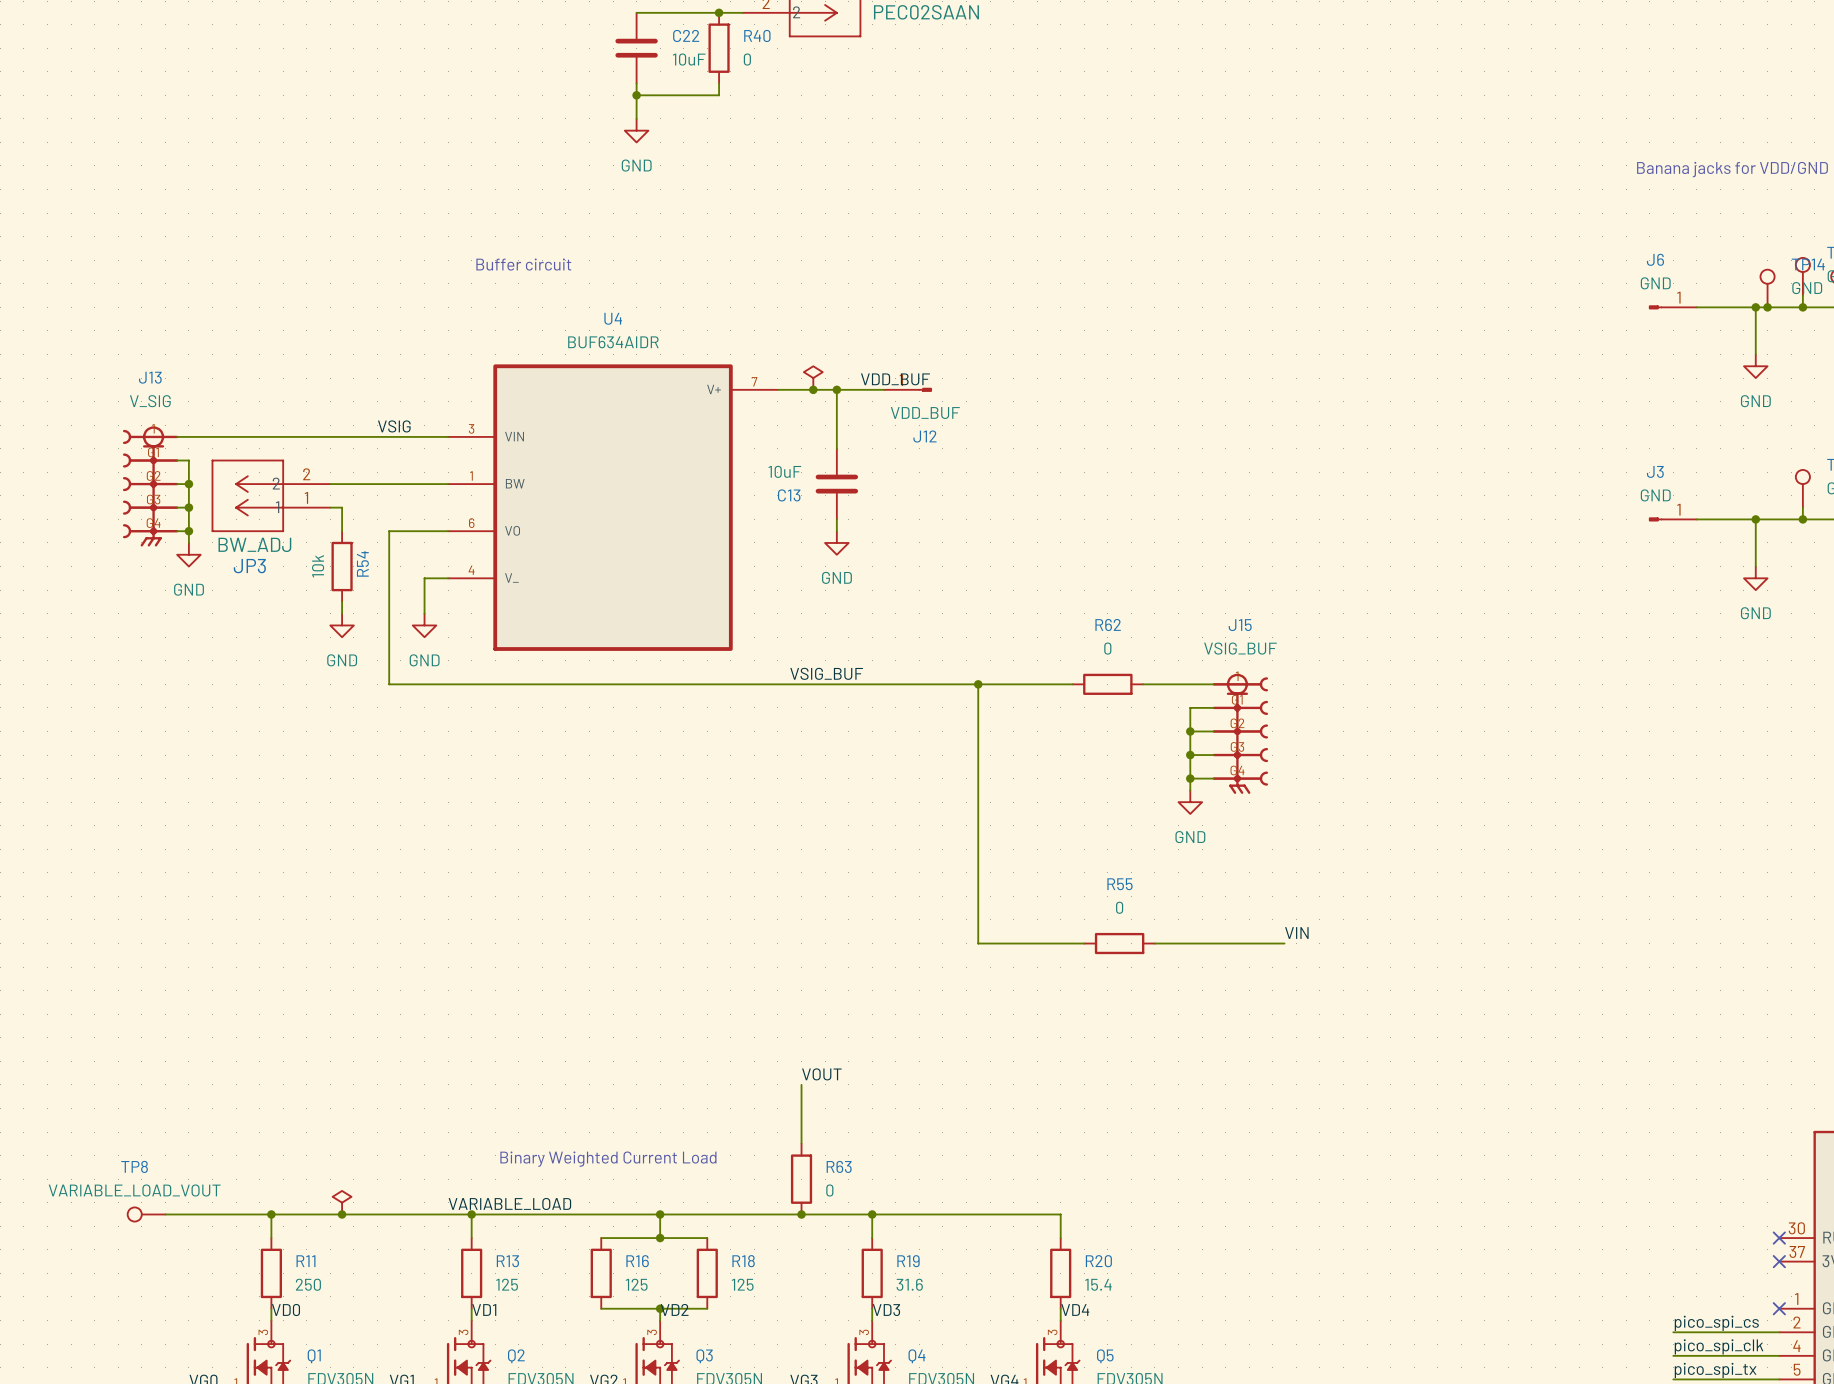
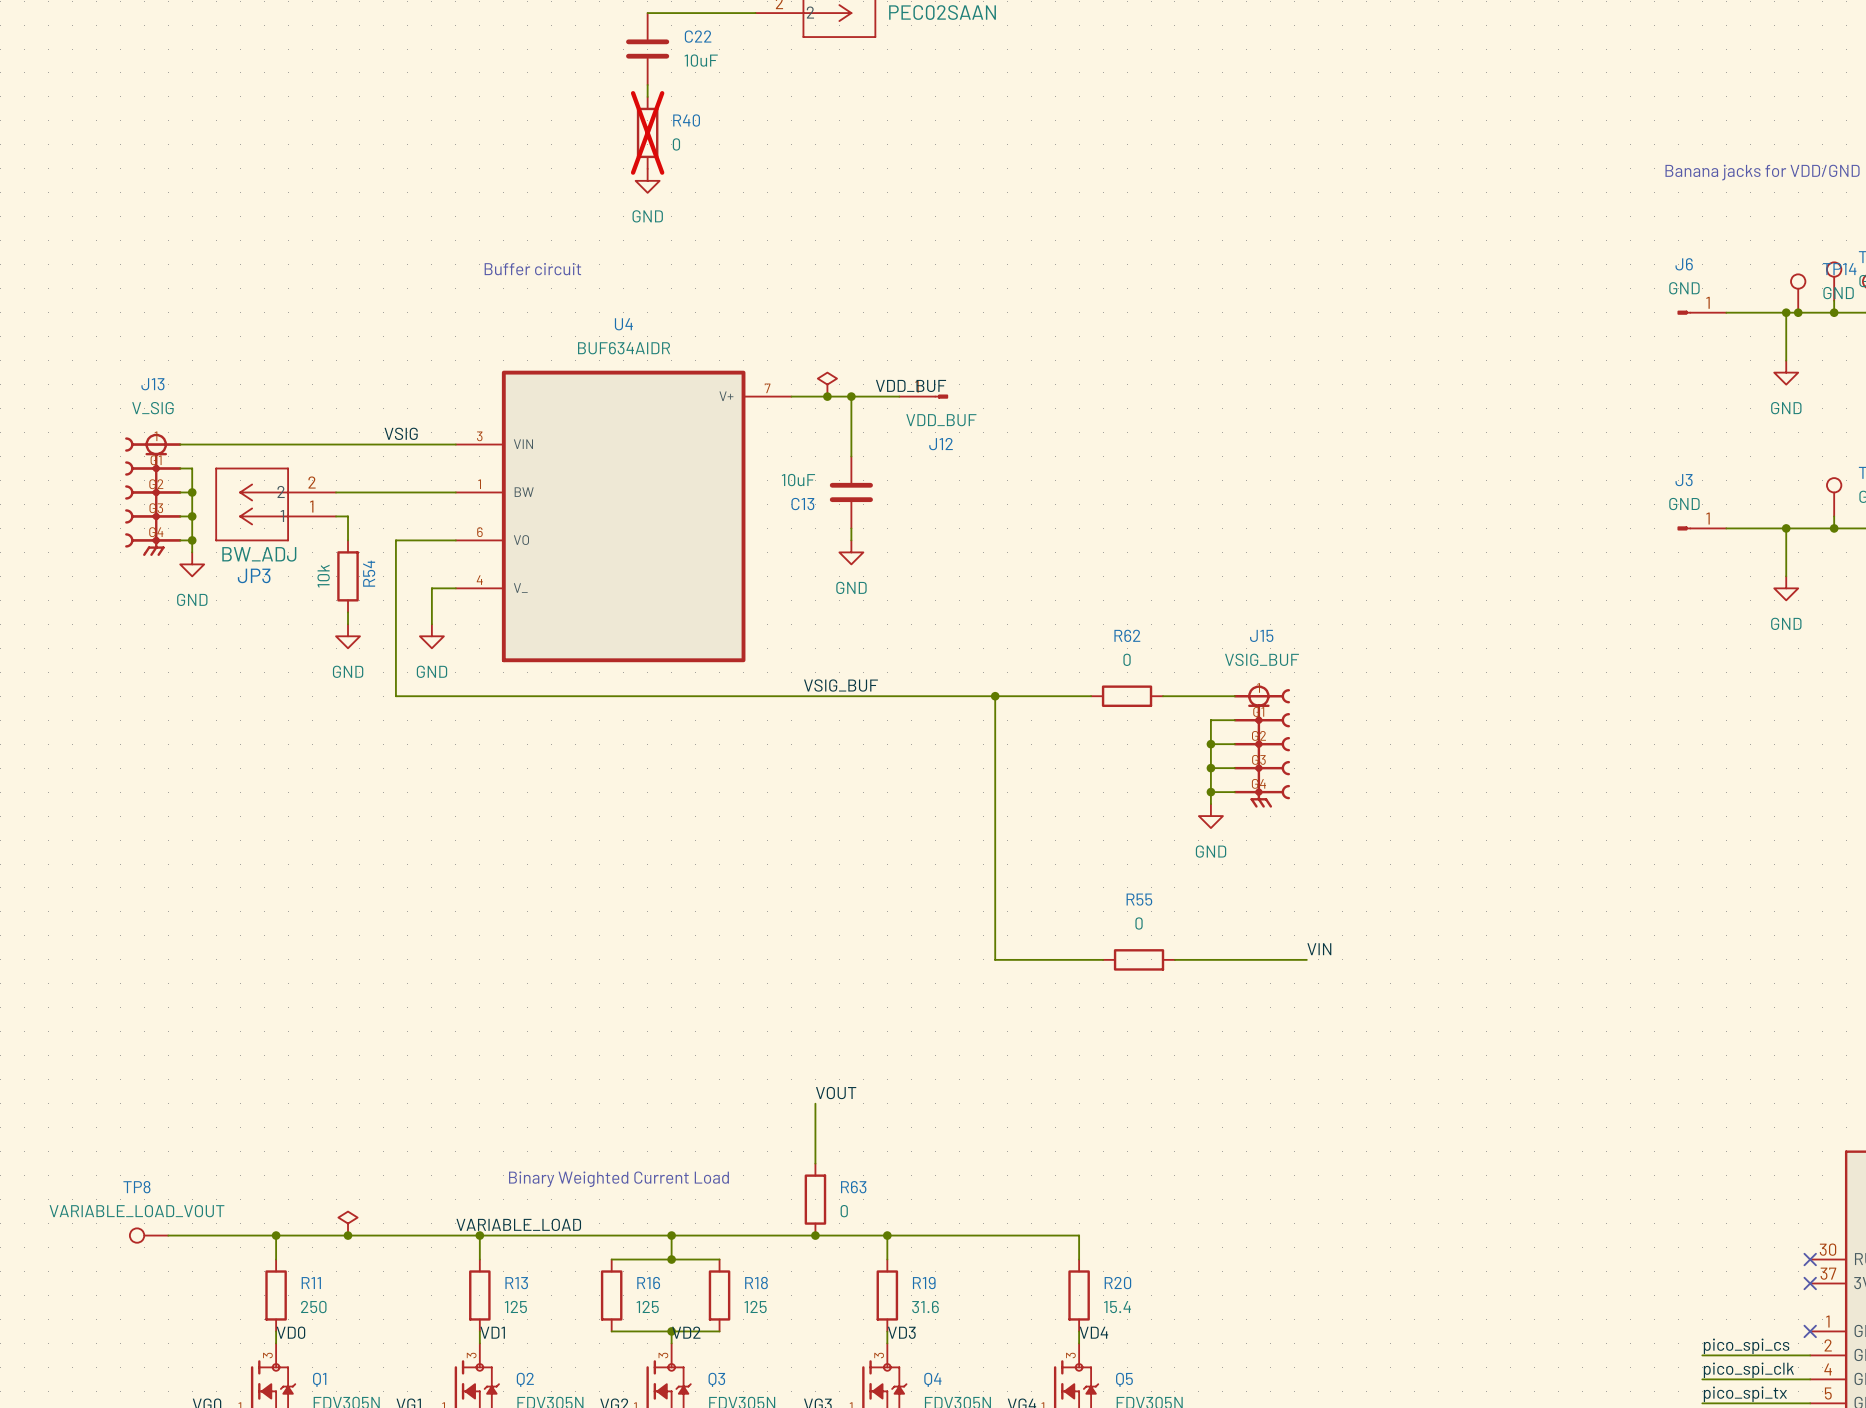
junction: (719, 12) -> none
R40 position: (719, 48) -> (647, 132)
wire: (719, 83) (719, 95) (636, 95) (636, 118) -> none
junction: (636, 95) -> none
R40 do-not-place cross: none -> (647, 132)
power symbol position: GND (636, 130) -> GND (647, 180)

